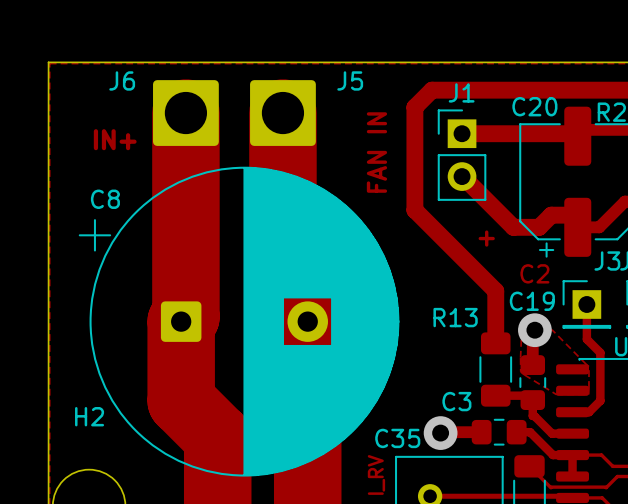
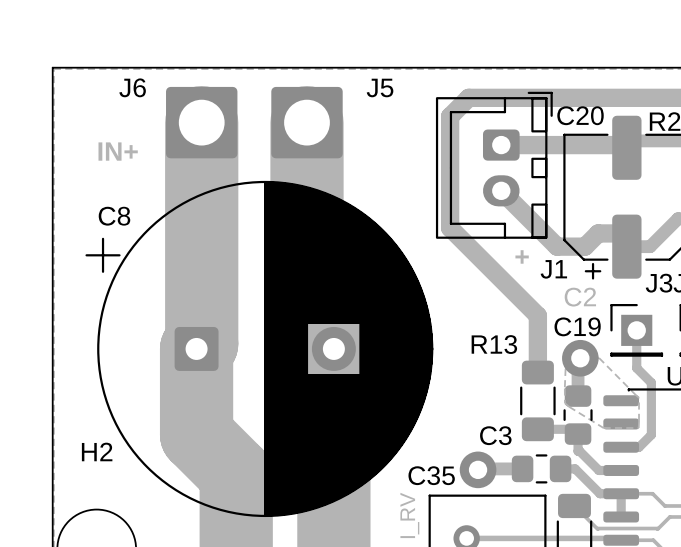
J1 name position: J1 (461, 92) -> J1 (553, 269)
J1 footprint: [437, 109, 487, 201] -> [435, 91, 553, 239]
text: FAN IN (376, 152) -> none

